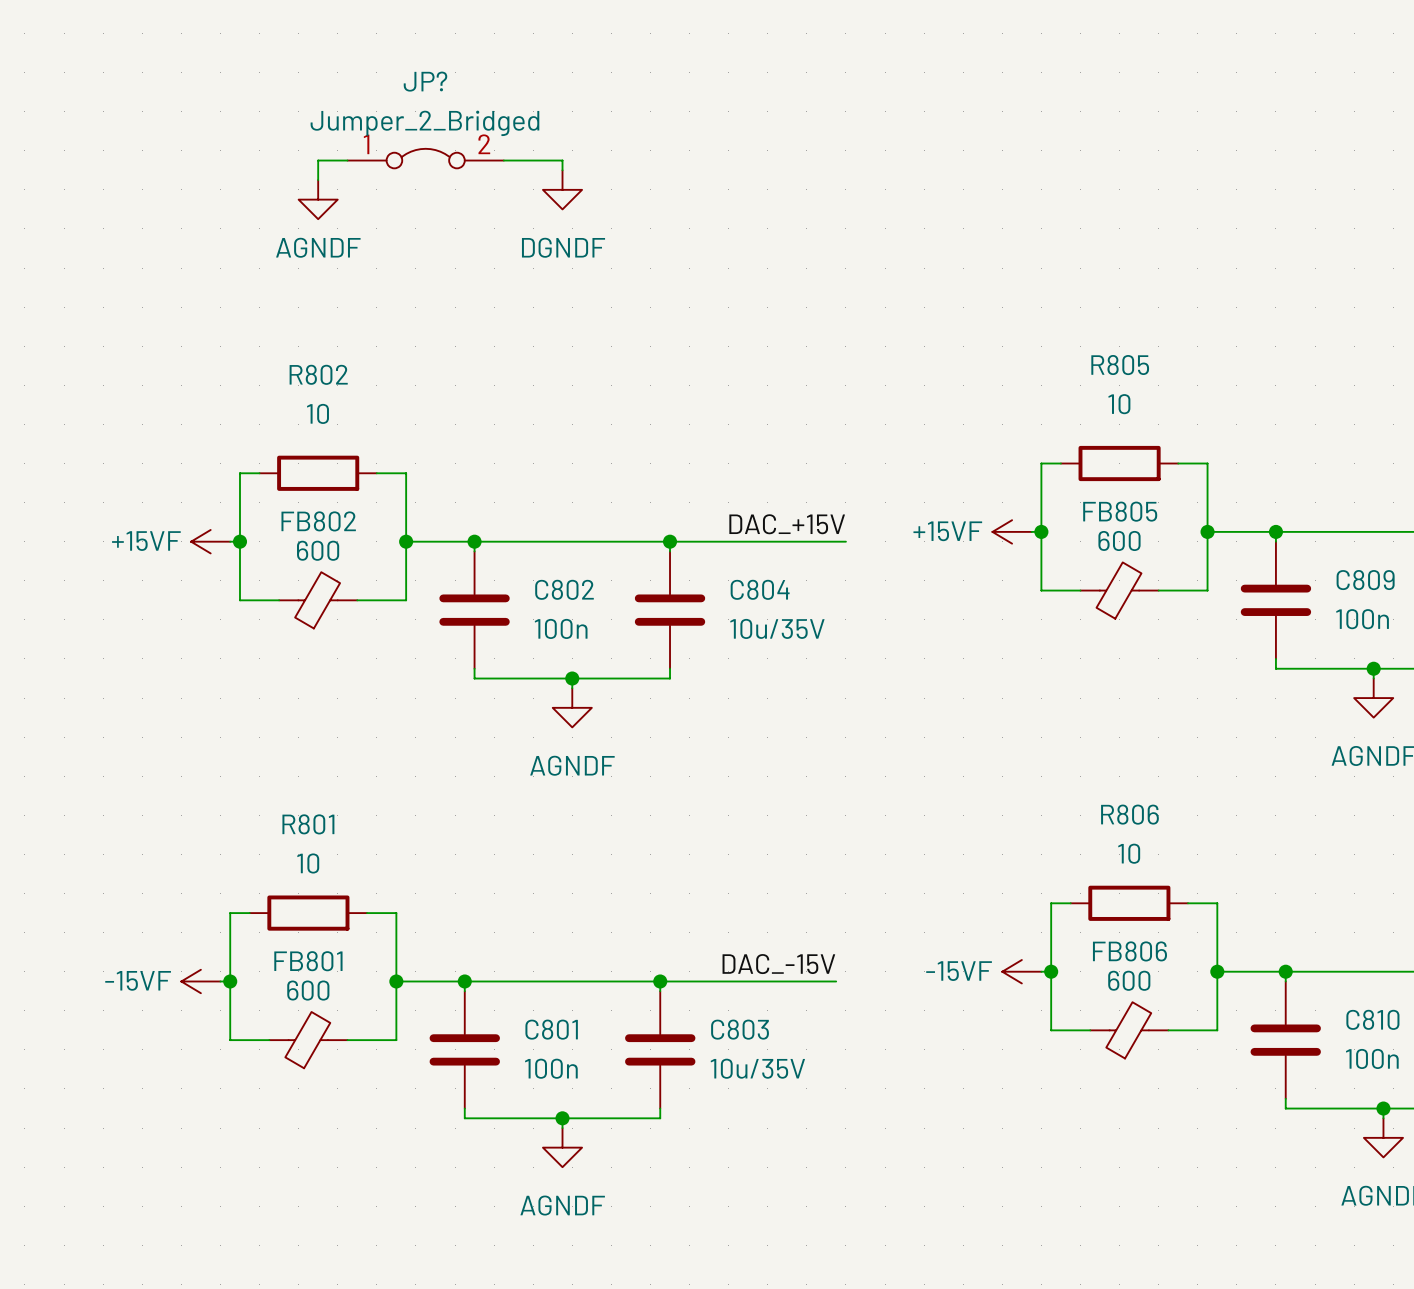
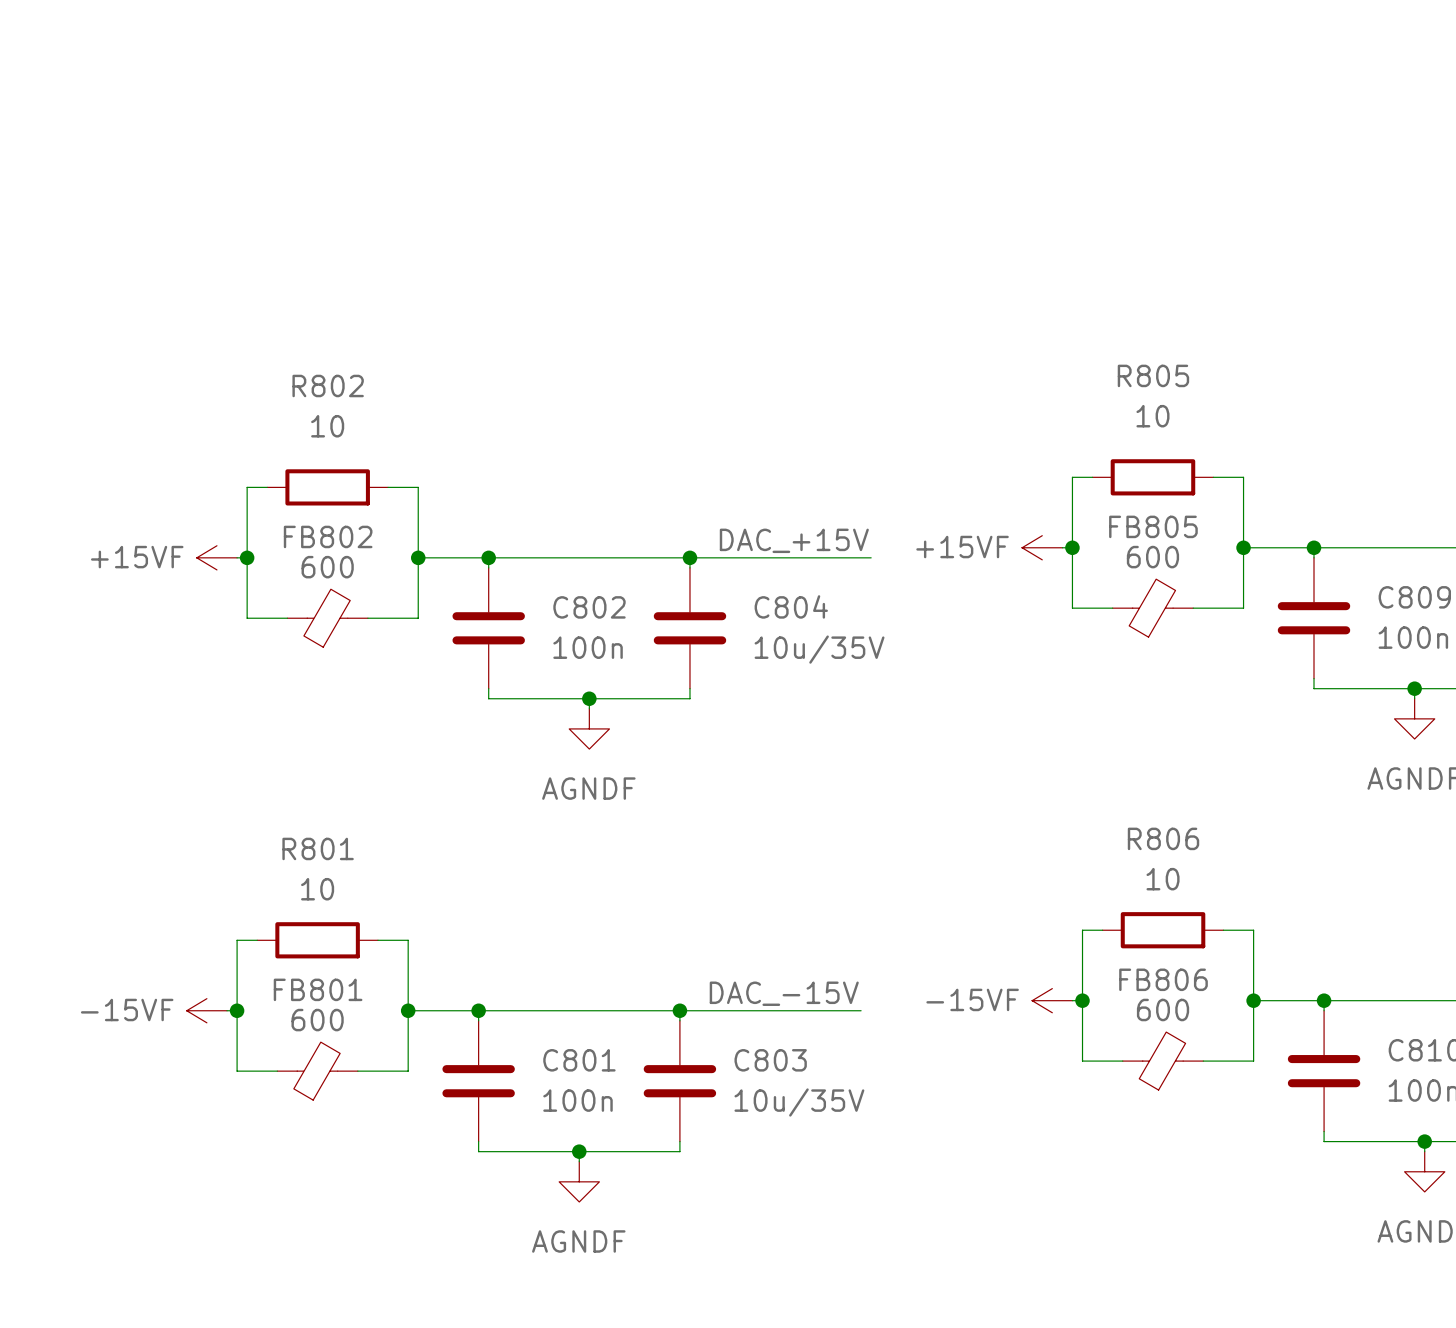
JP?: Jumper_2_Bridged (425, 158) -> none
wire: (347, 160) (318, 160) (318, 180) -> none
wire: (503, 160) (562, 160) (562, 170) -> none
power symbol: DGNDF (562, 189) -> none
power symbol: AGNDF (318, 199) -> none

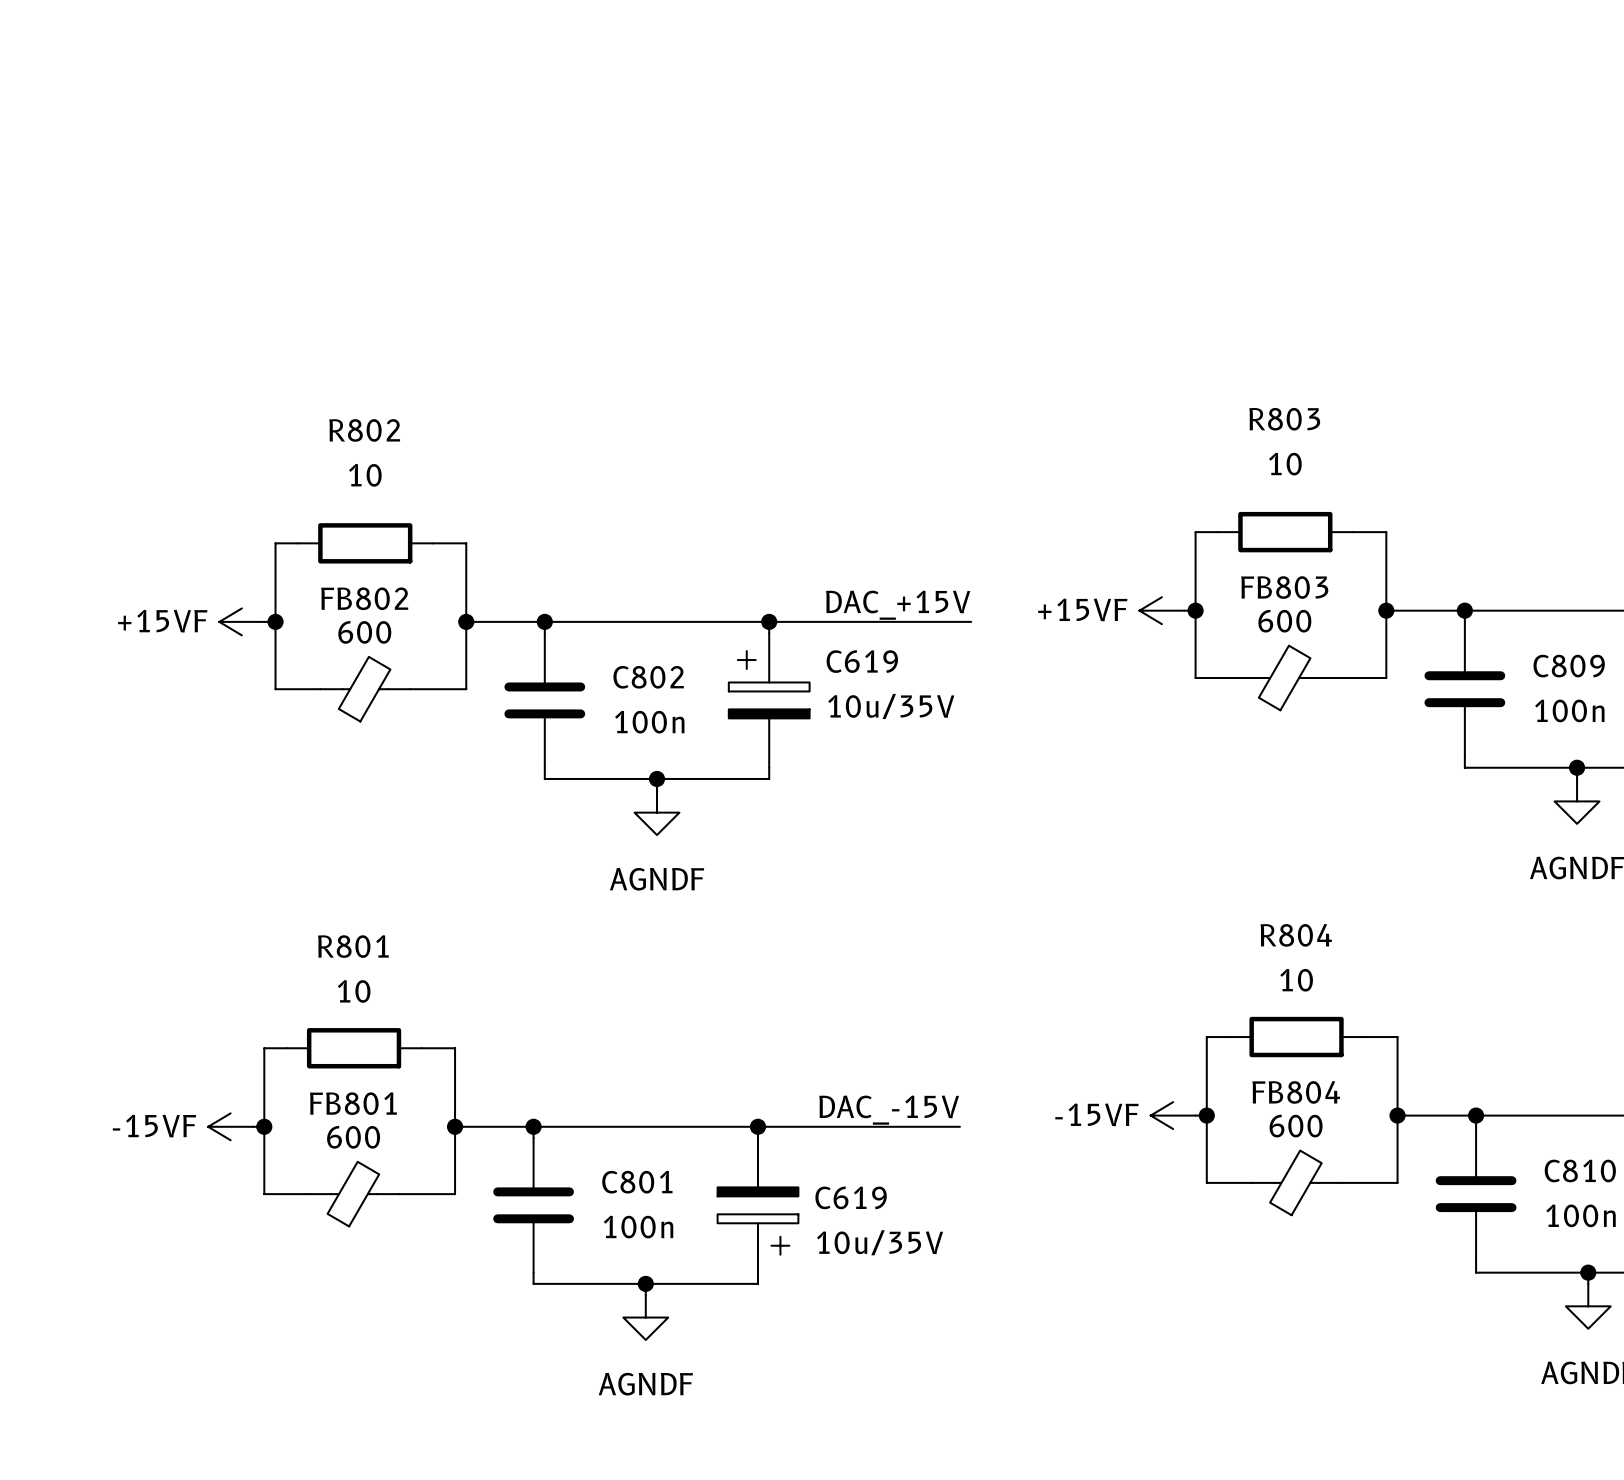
R805 name: R805 (1153, 375) -> R803 (1284, 419)
FB805 name: FB805 (1153, 526) -> FB803 (1284, 587)
C804: 10u/35V (689, 628) -> none
C619: none -> 10u/35V (769, 700)
R806 name: R806 (1163, 838) -> R804 (1296, 935)
FB806 name: FB806 (1163, 979) -> FB804 (1296, 1092)
C803: 10u/35V (679, 1081) -> none
C619: none -> 10u/35V (757, 1205)

